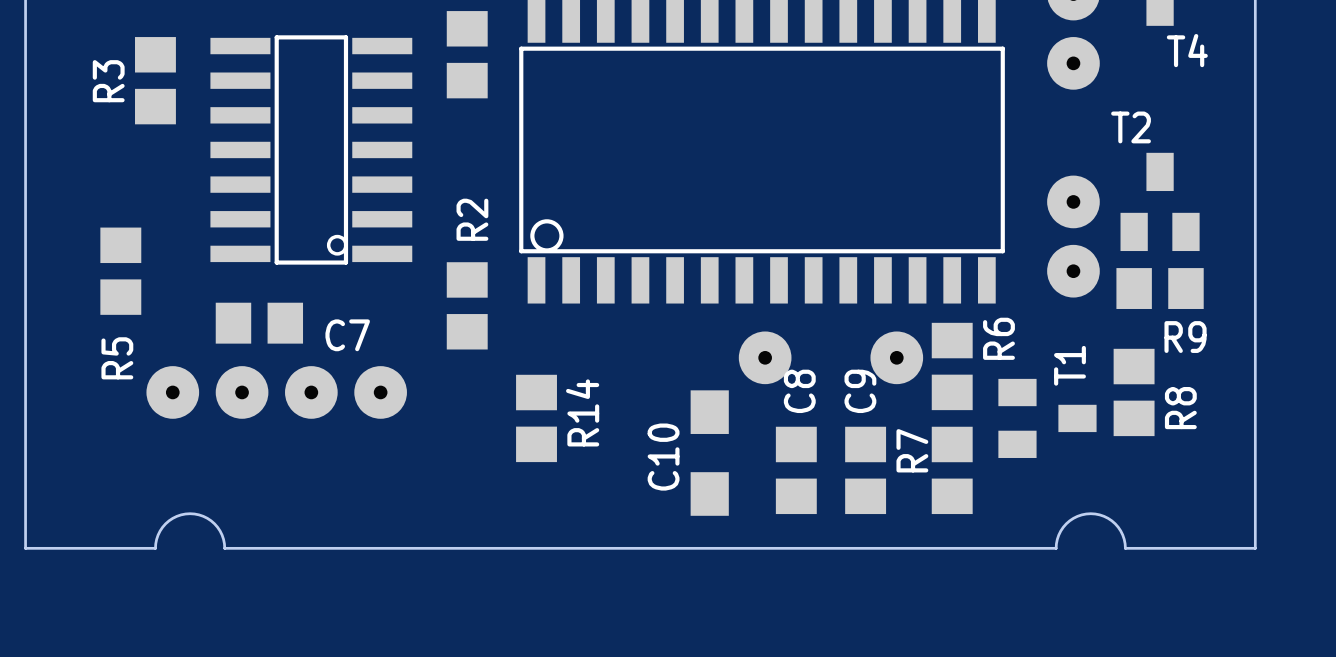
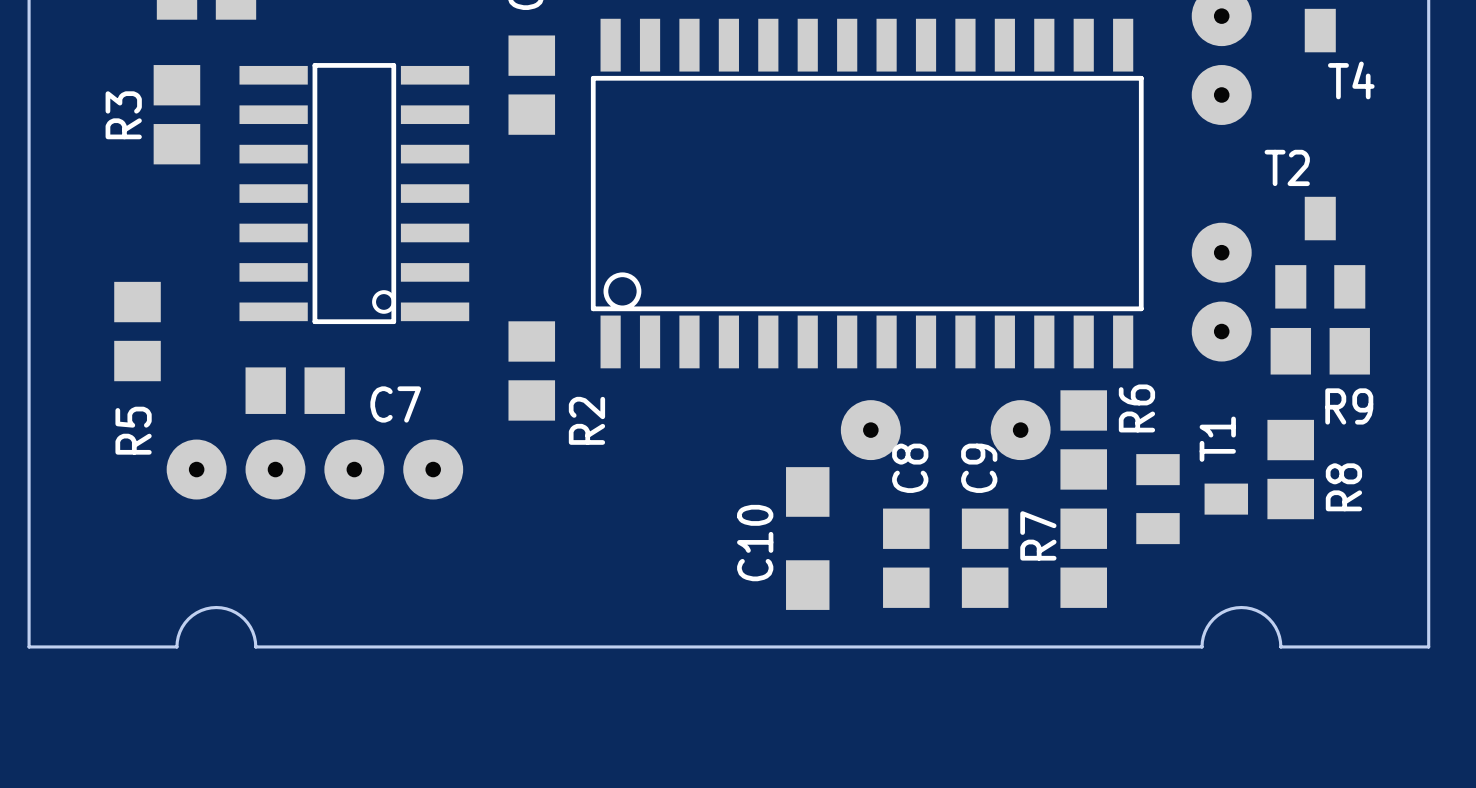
R2 name position: R2 (472, 219) -> R2 (586, 420)
R14: (536, 418) -> none

